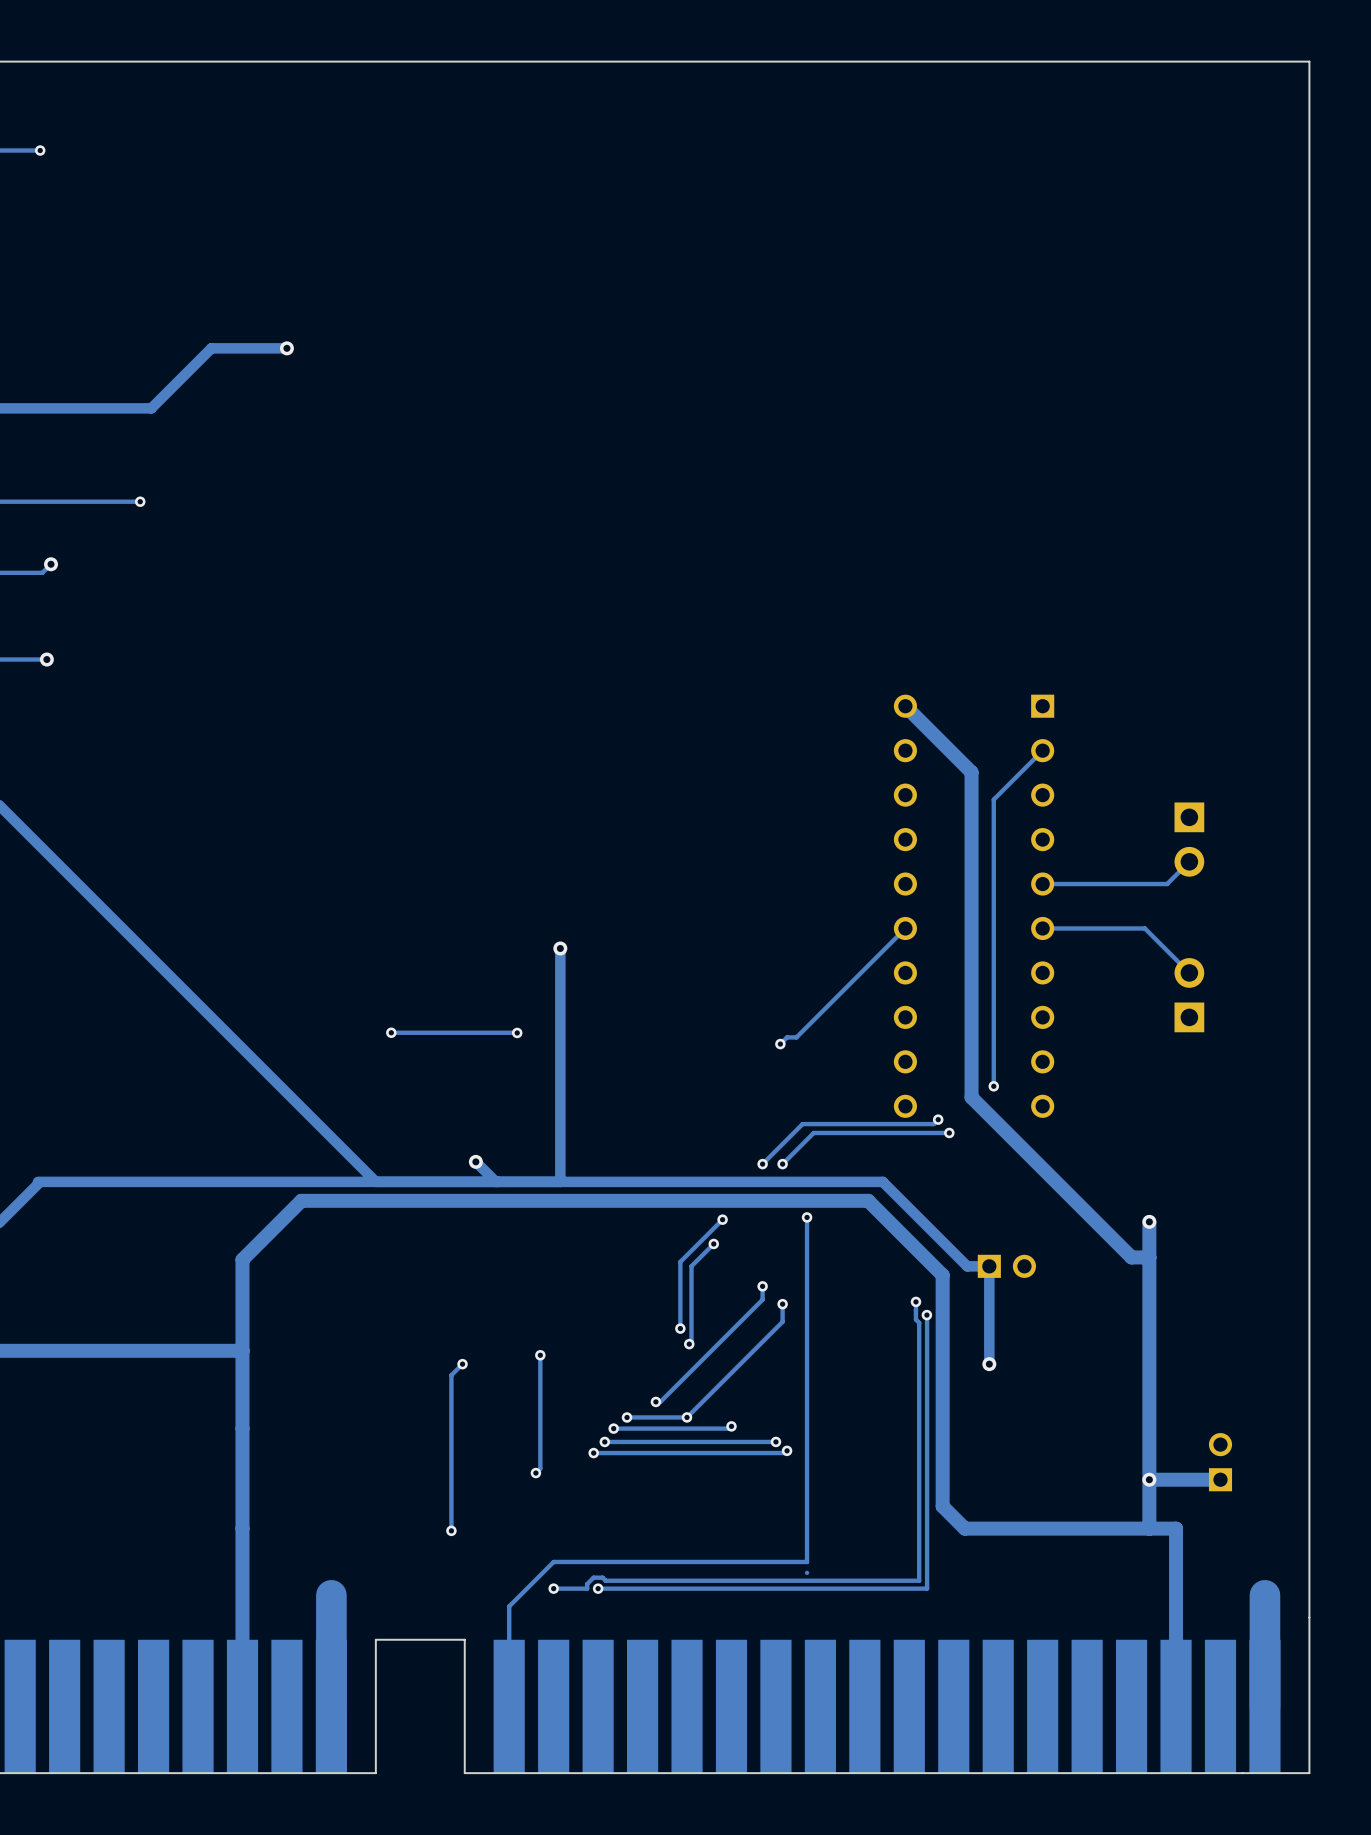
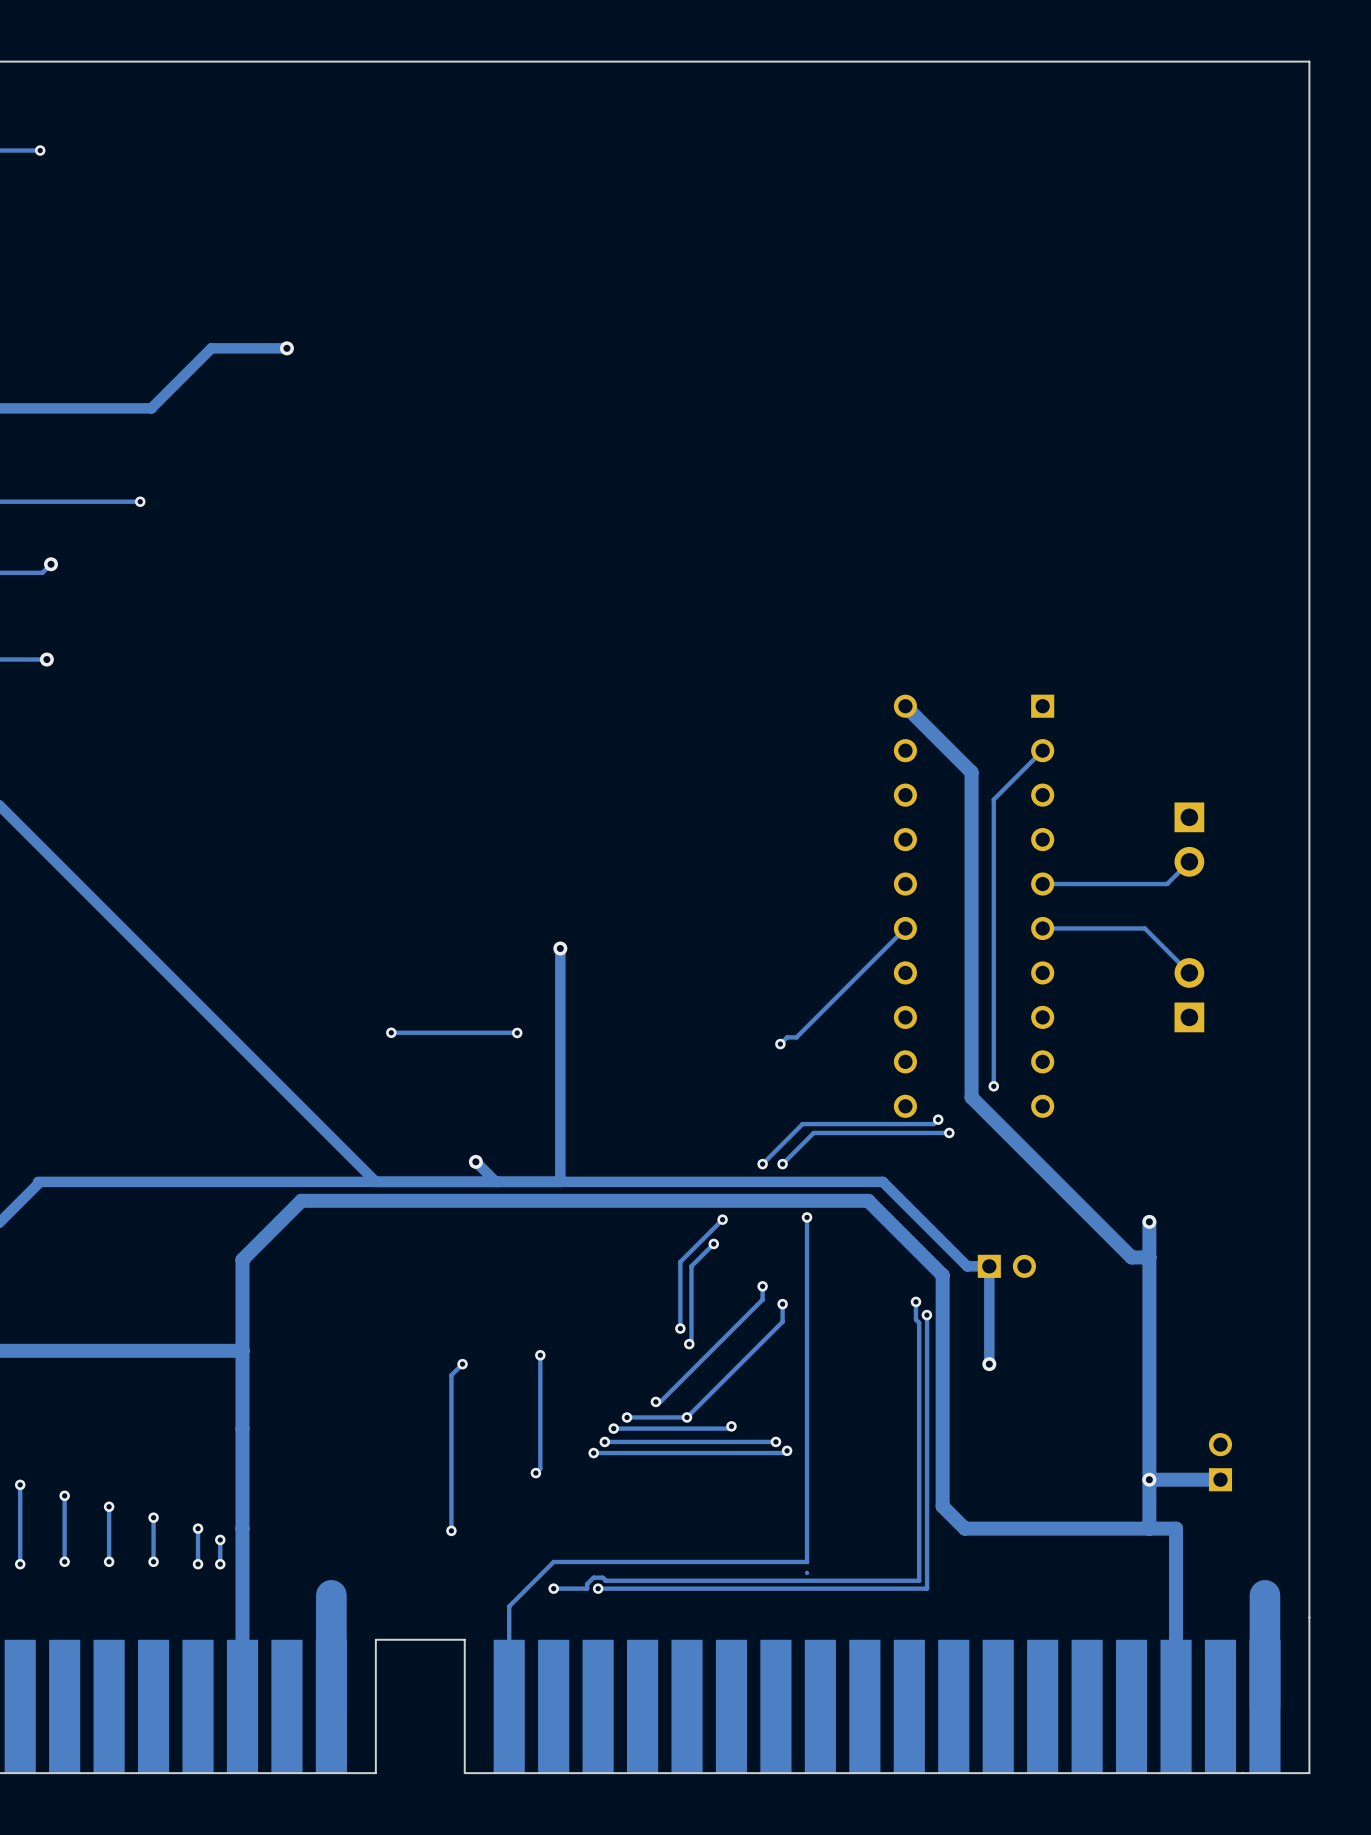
track: none -> (20, 1484) (20, 1564)
via: none -> (20, 1484)
track: none -> (64, 1495) (64, 1561)
via: none -> (64, 1495)
track: none -> (109, 1506) (109, 1561)
via: none -> (109, 1506)
track: none -> (153, 1517) (153, 1561)
via: none -> (153, 1517)
track: none -> (198, 1528) (198, 1564)
via: none -> (198, 1528)
track: none -> (220, 1539) (220, 1564)
via: none -> (220, 1539)
via: none -> (64, 1561)
via: none -> (109, 1561)
via: none -> (153, 1561)
via: none -> (20, 1564)
via: none -> (198, 1564)
via: none -> (220, 1564)

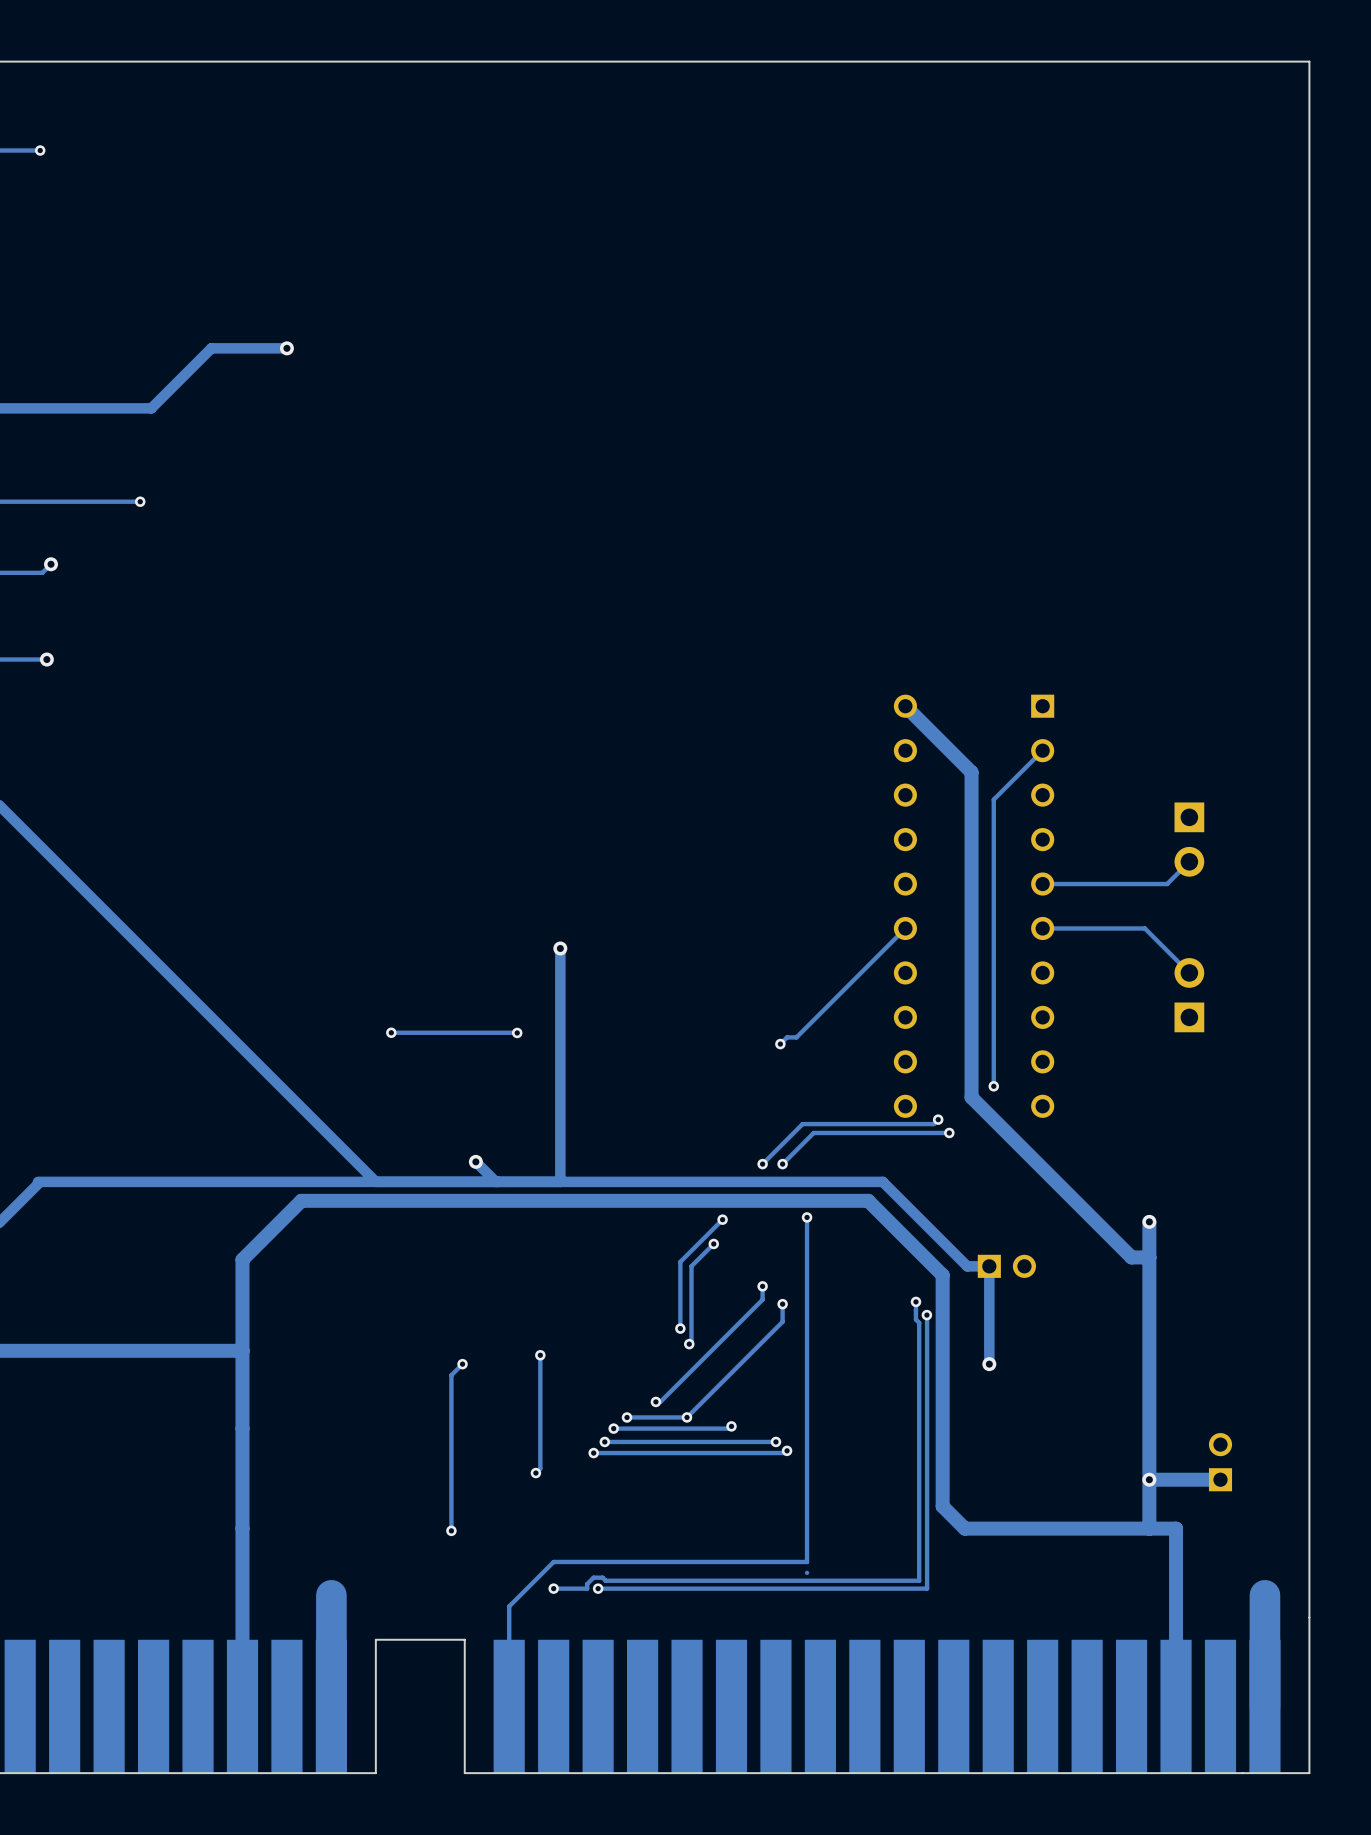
track: (20, 1484) (20, 1564) -> none
via: (20, 1484) -> none
track: (64, 1495) (64, 1561) -> none
via: (64, 1495) -> none
track: (109, 1506) (109, 1561) -> none
via: (109, 1506) -> none
track: (153, 1517) (153, 1561) -> none
via: (153, 1517) -> none
track: (198, 1528) (198, 1564) -> none
via: (198, 1528) -> none
track: (220, 1539) (220, 1564) -> none
via: (220, 1539) -> none
via: (64, 1561) -> none
via: (109, 1561) -> none
via: (153, 1561) -> none
via: (20, 1564) -> none
via: (198, 1564) -> none
via: (220, 1564) -> none

